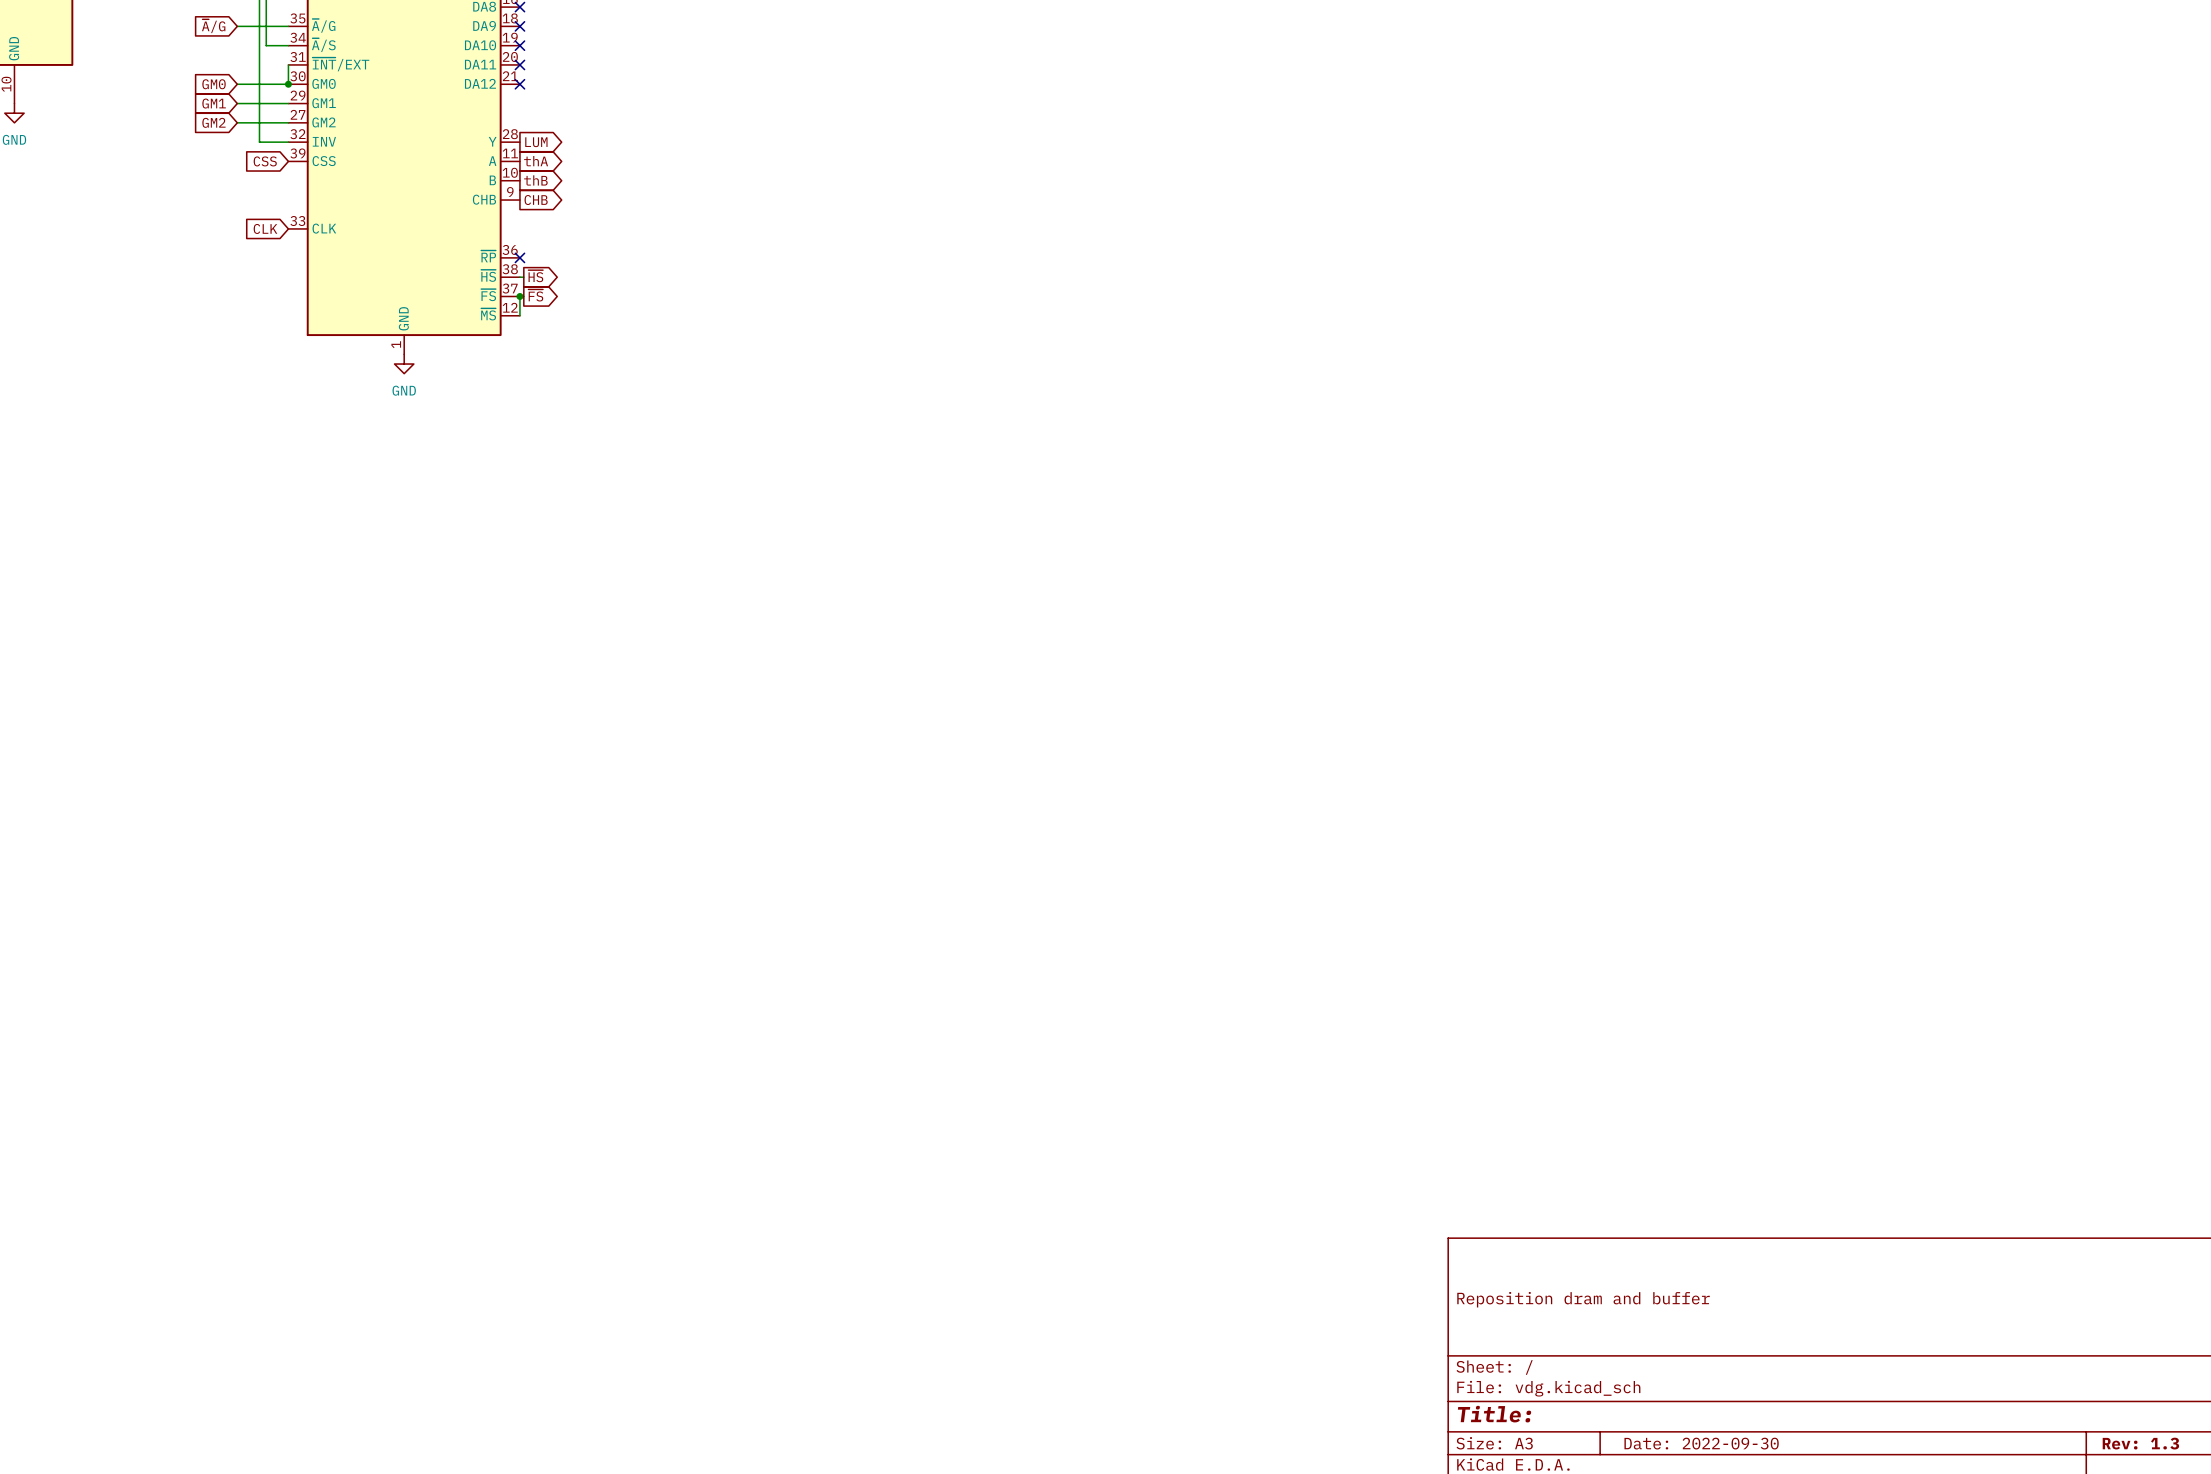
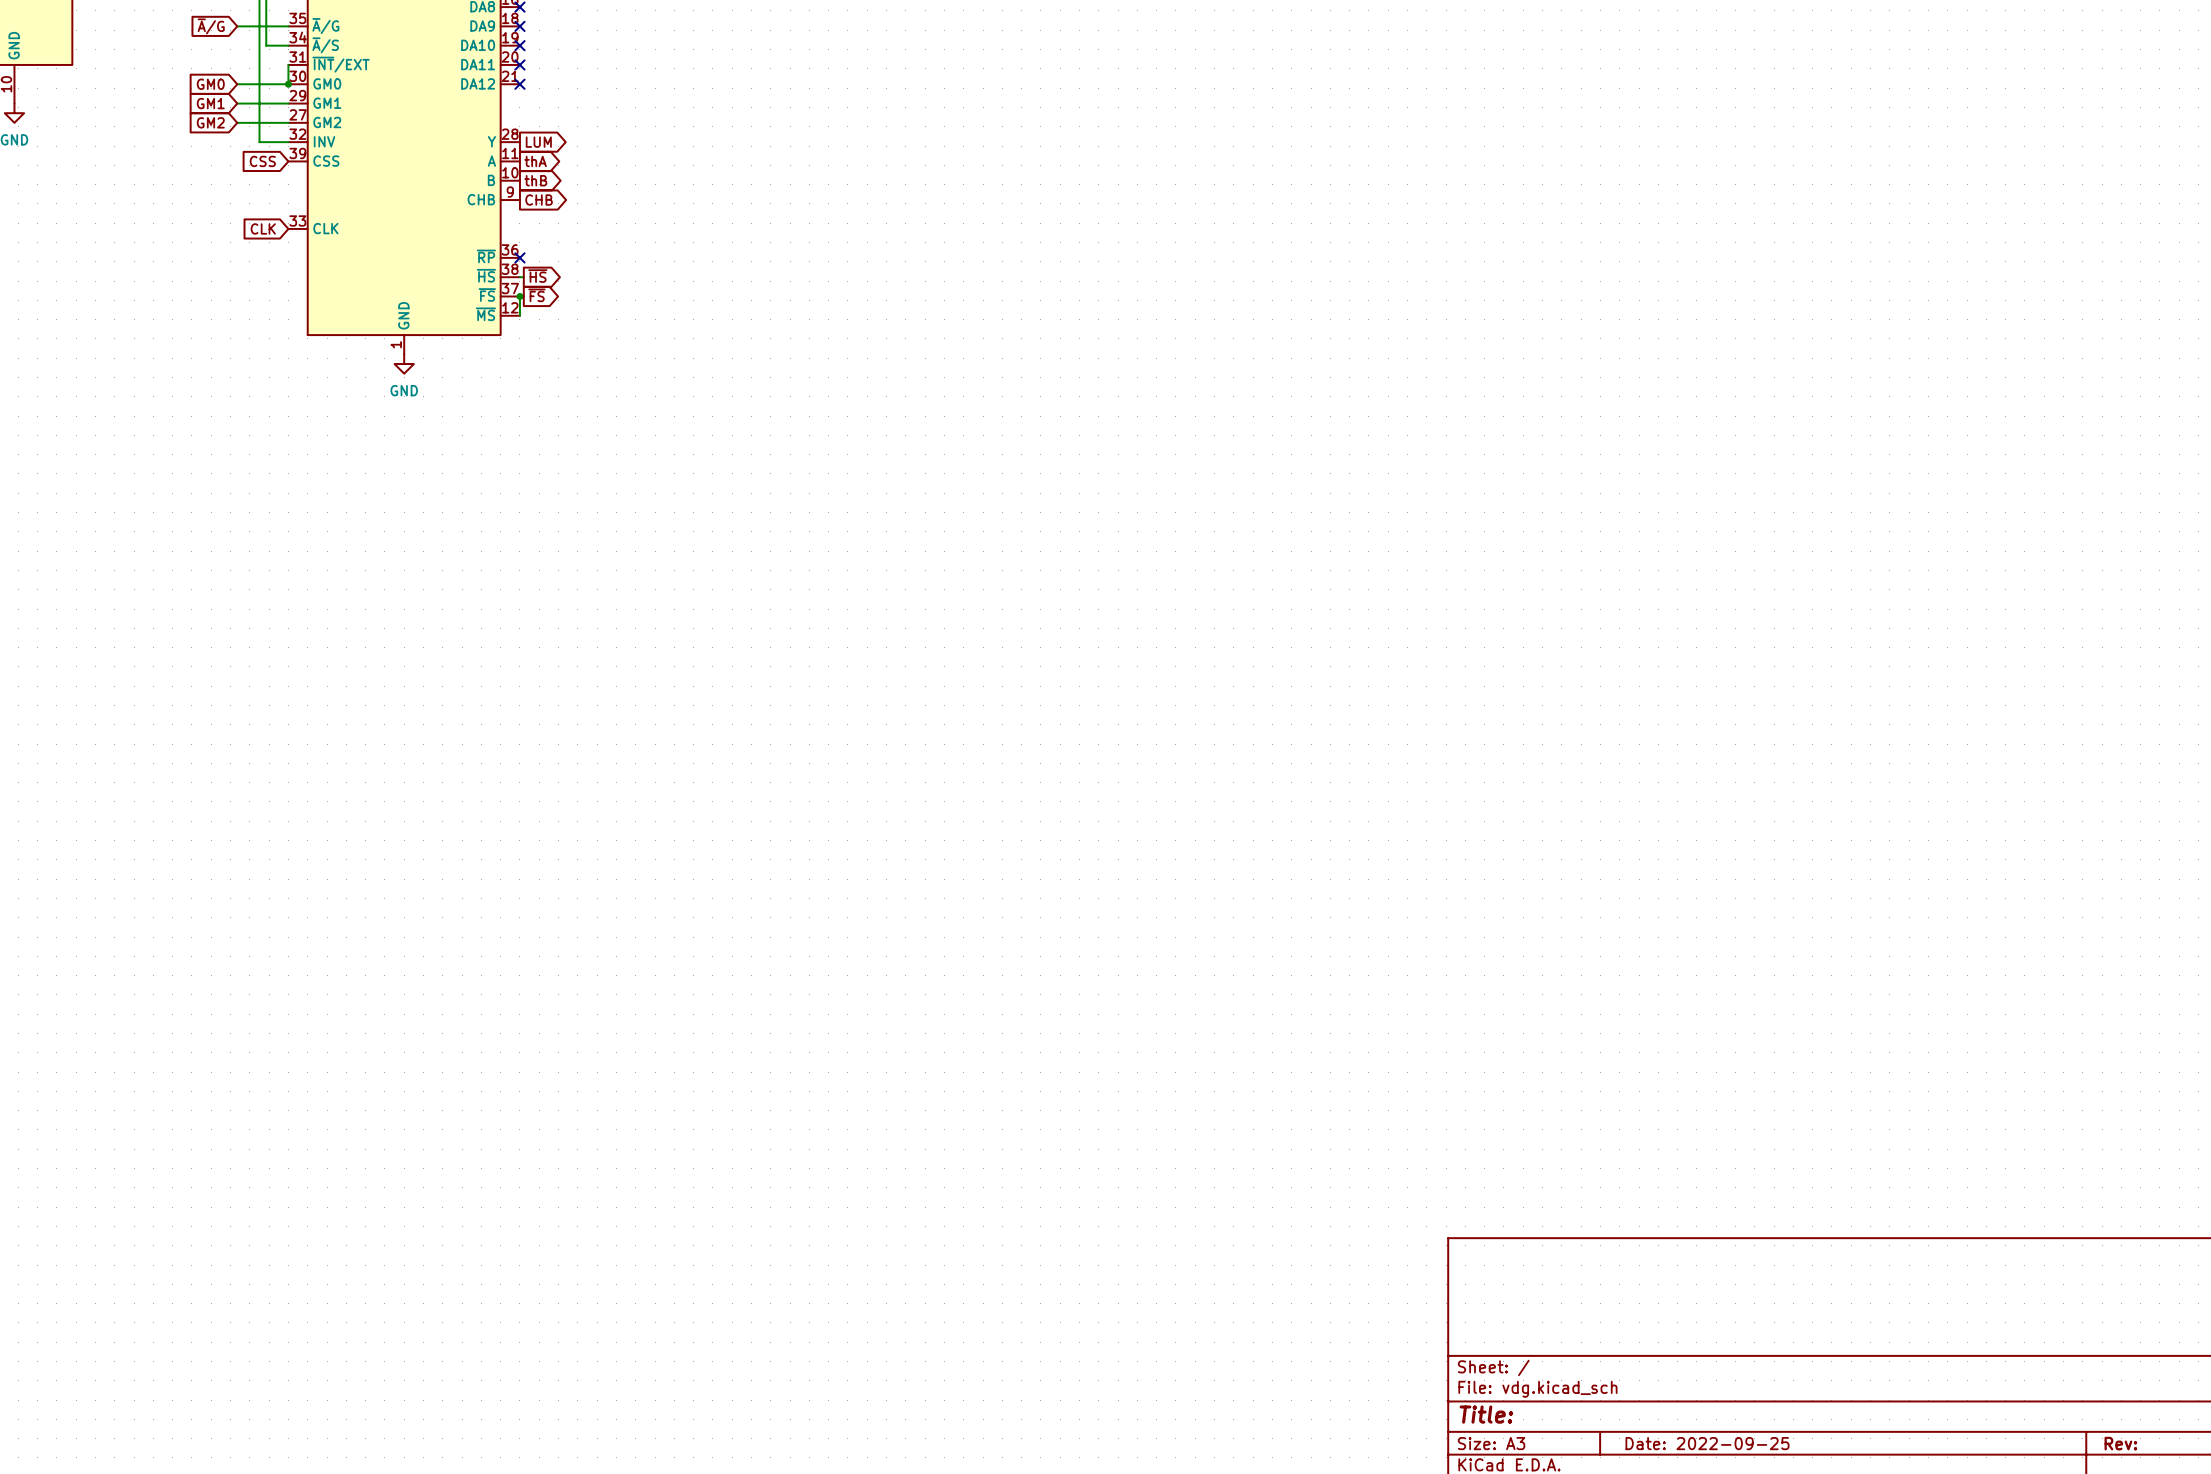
title block: Reposition dram and buffer (1583, 1299) -> none
title block: Date: 2022-09-30 (1701, 1443) -> Date: 2022-09-25 (1707, 1443)
title block: Rev: 1.3 (2140, 1443) -> Rev: (2120, 1443)

